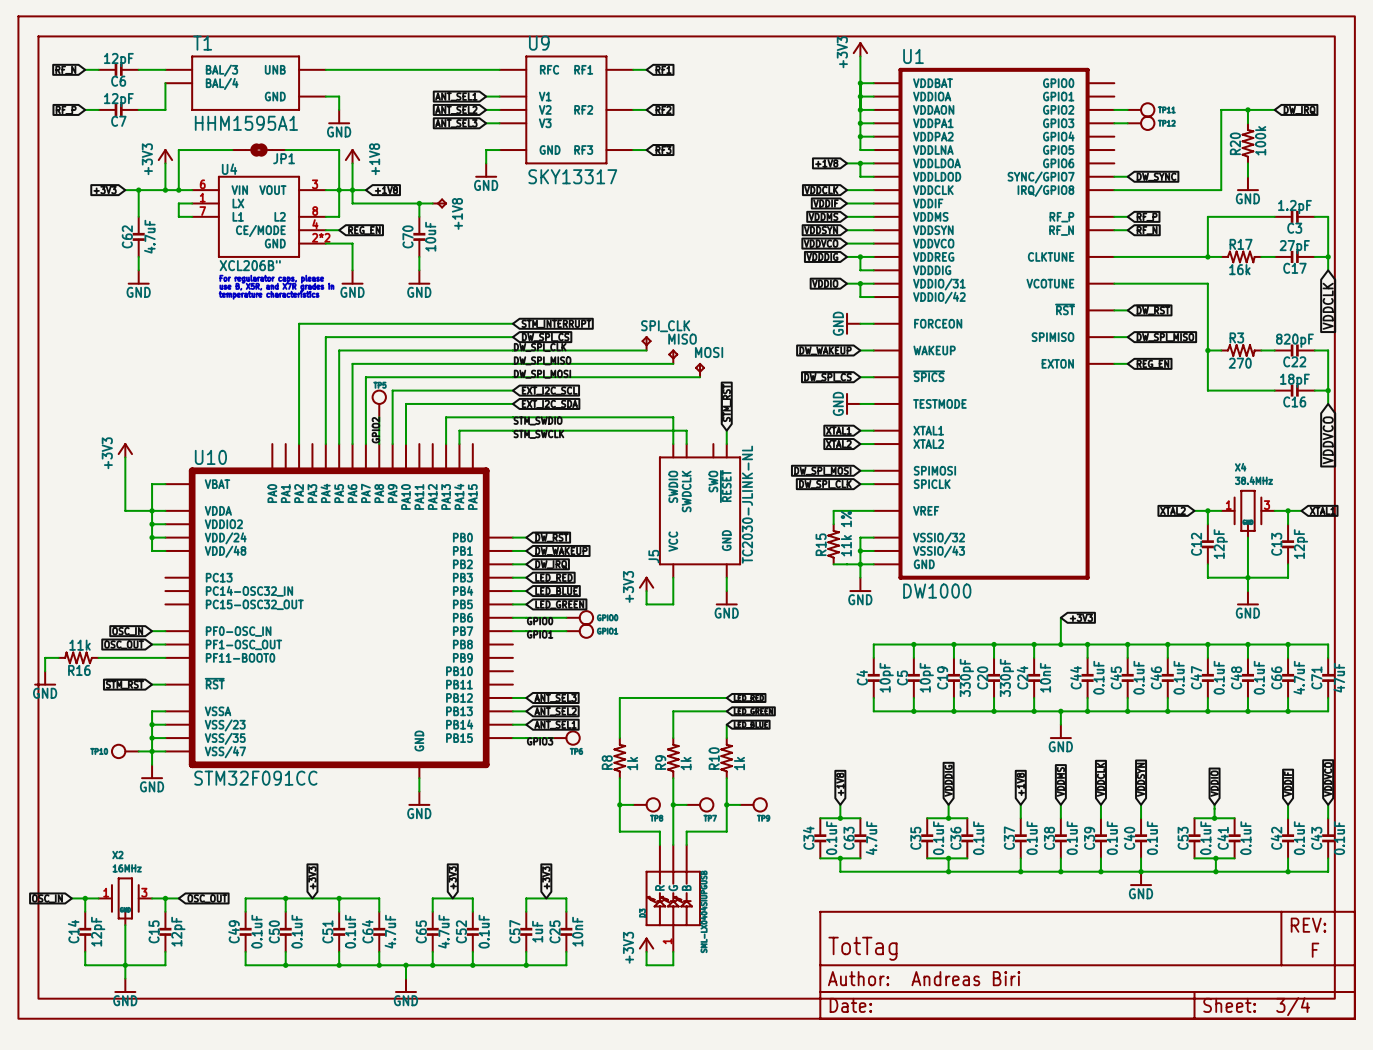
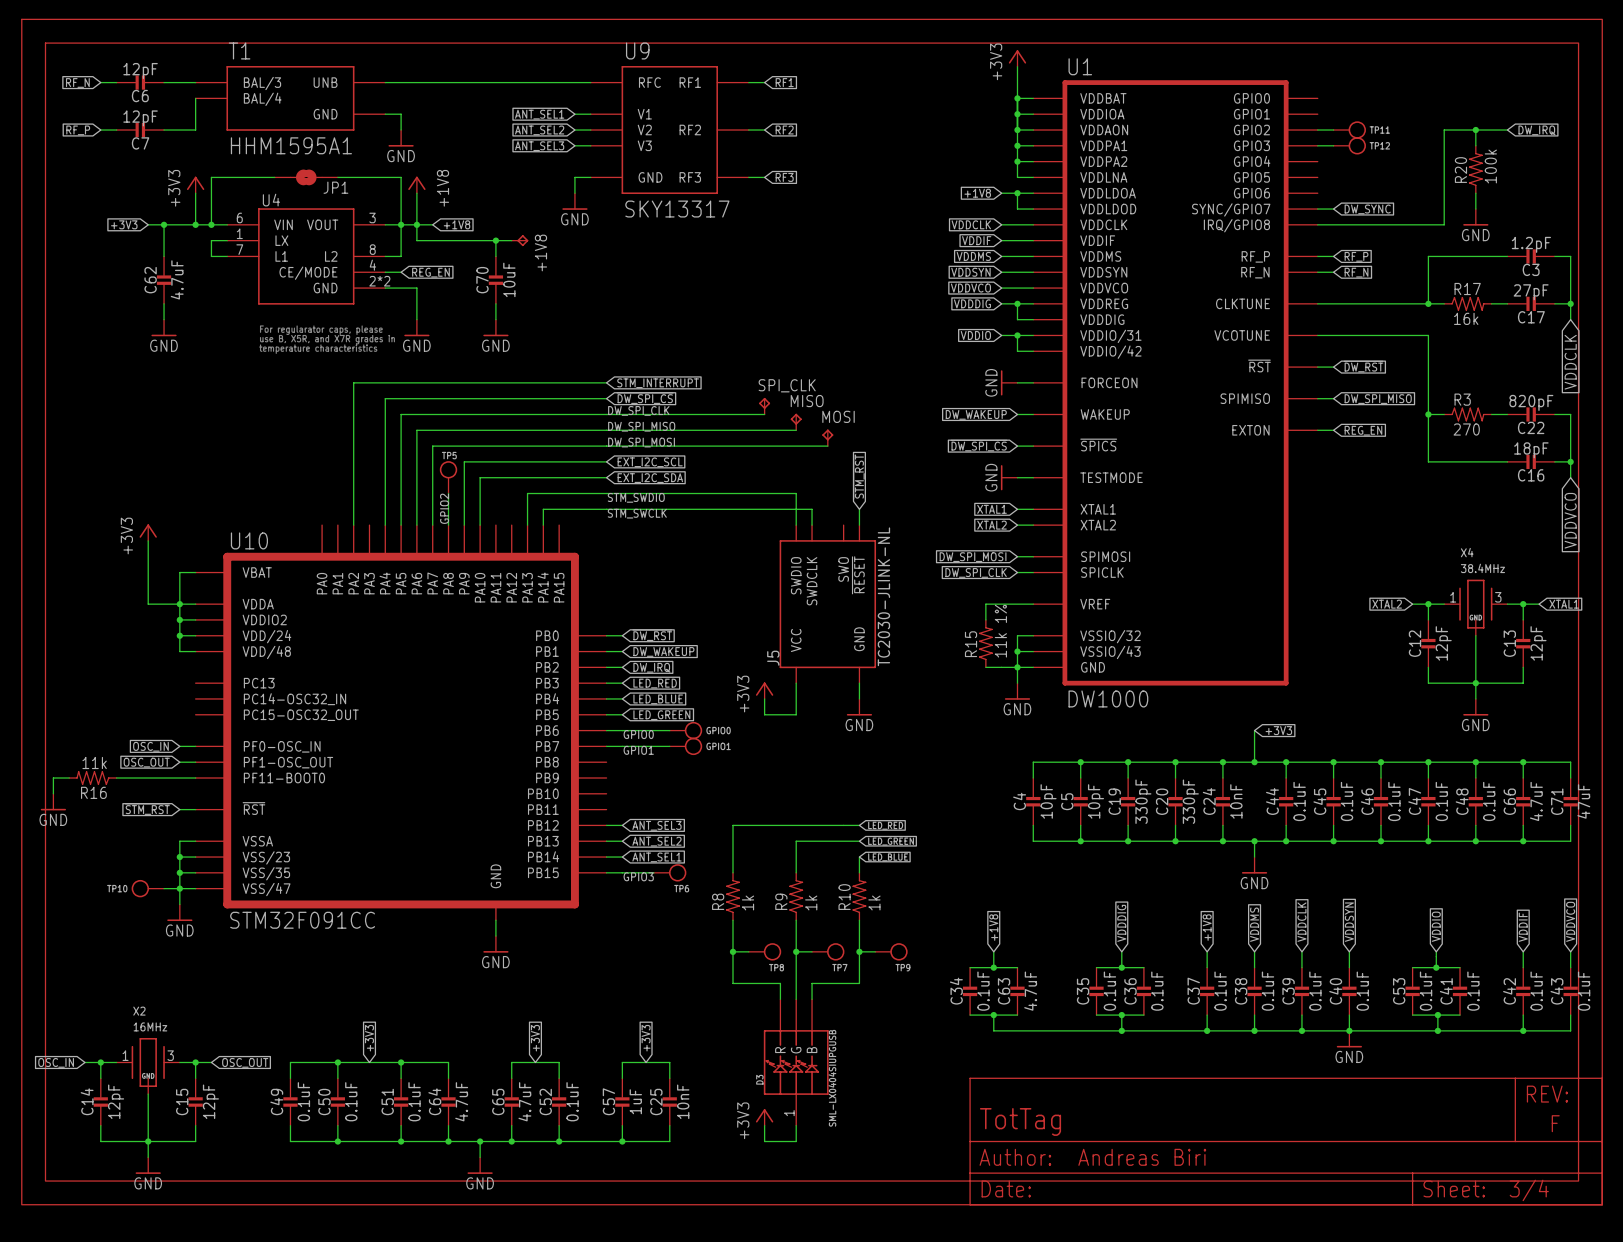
U4 value: XCL206B" (250, 265) -> none

